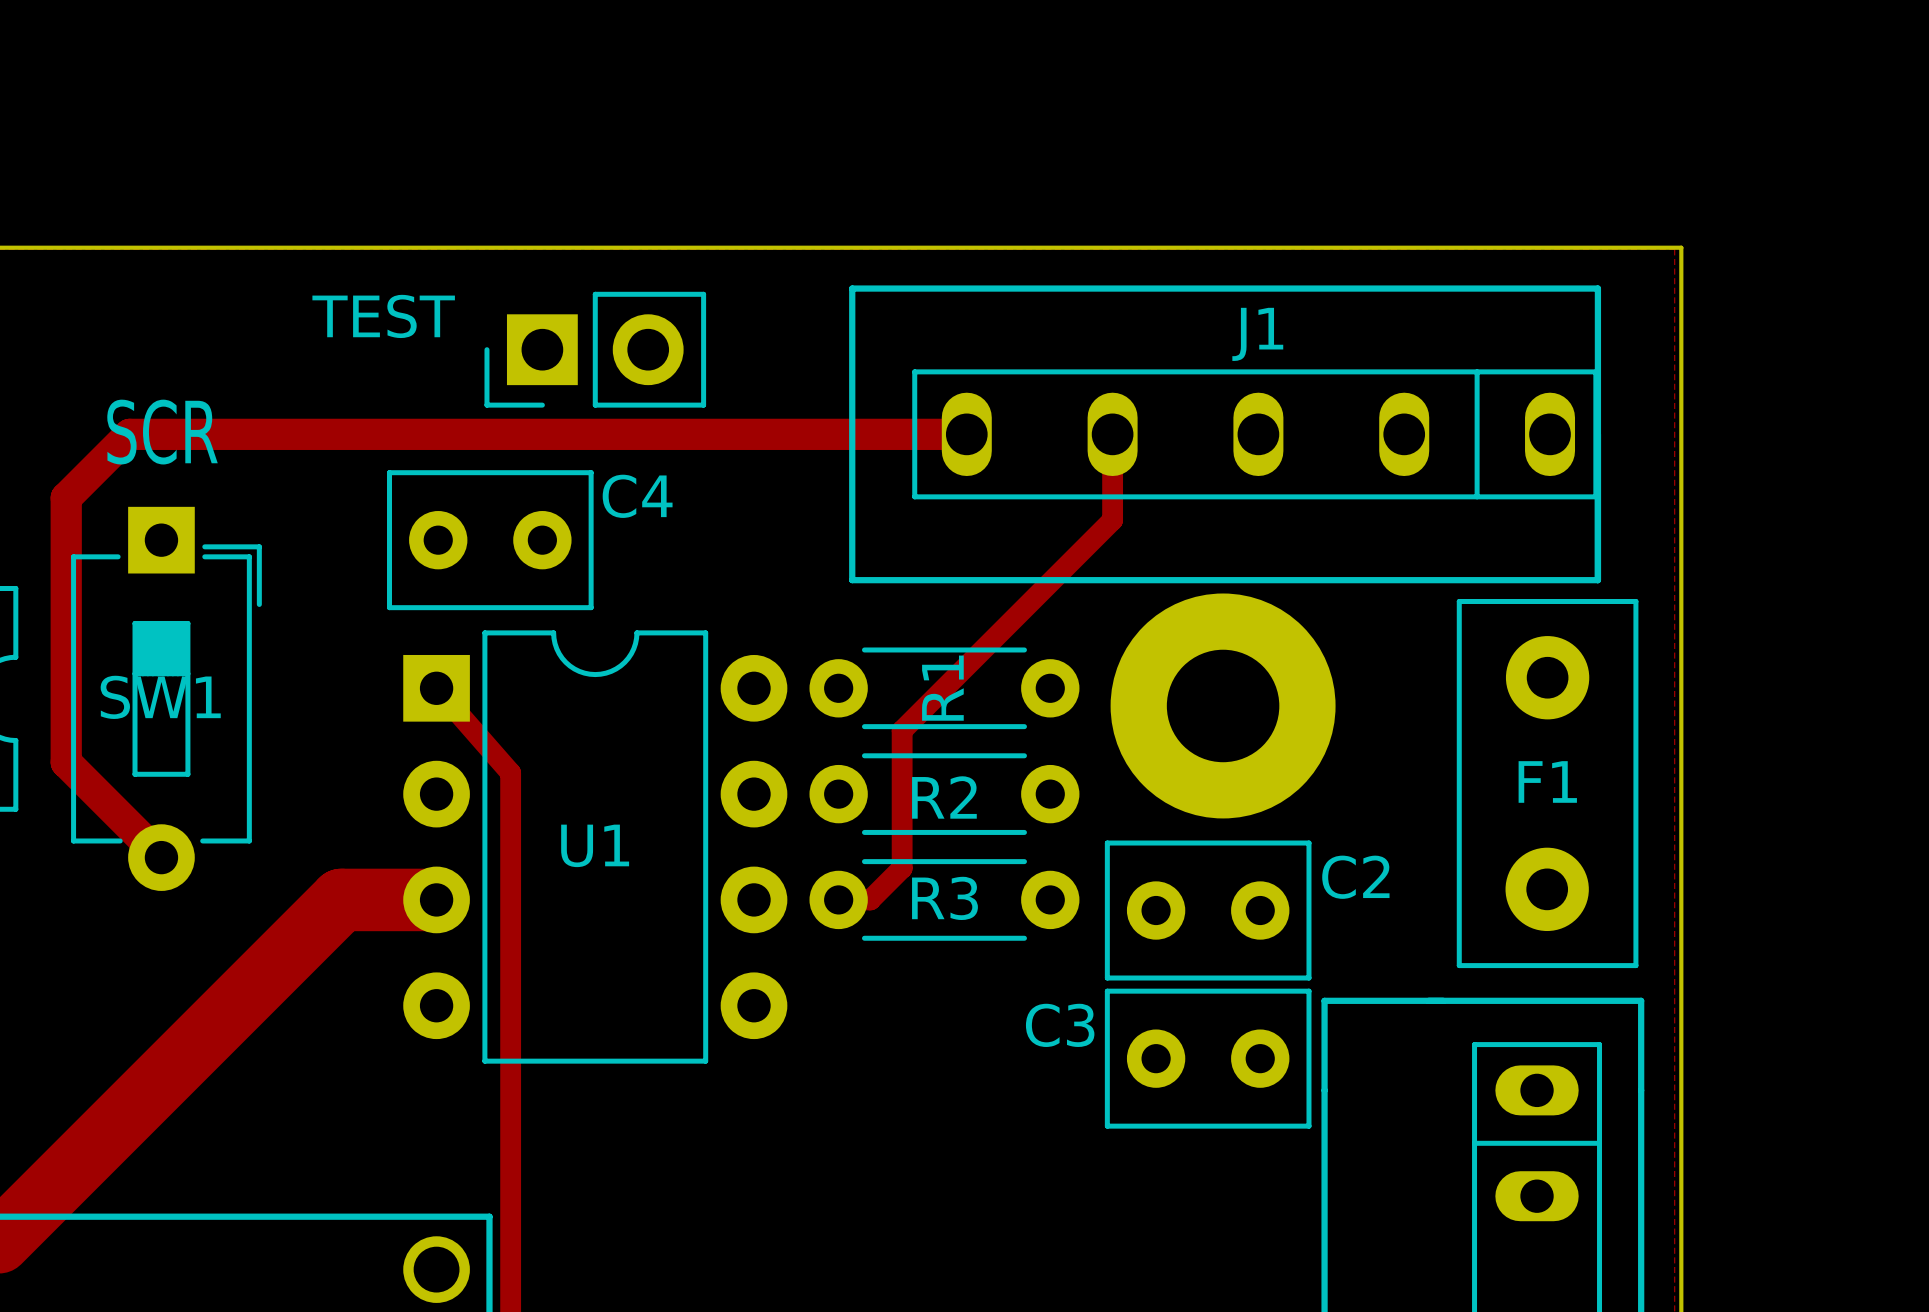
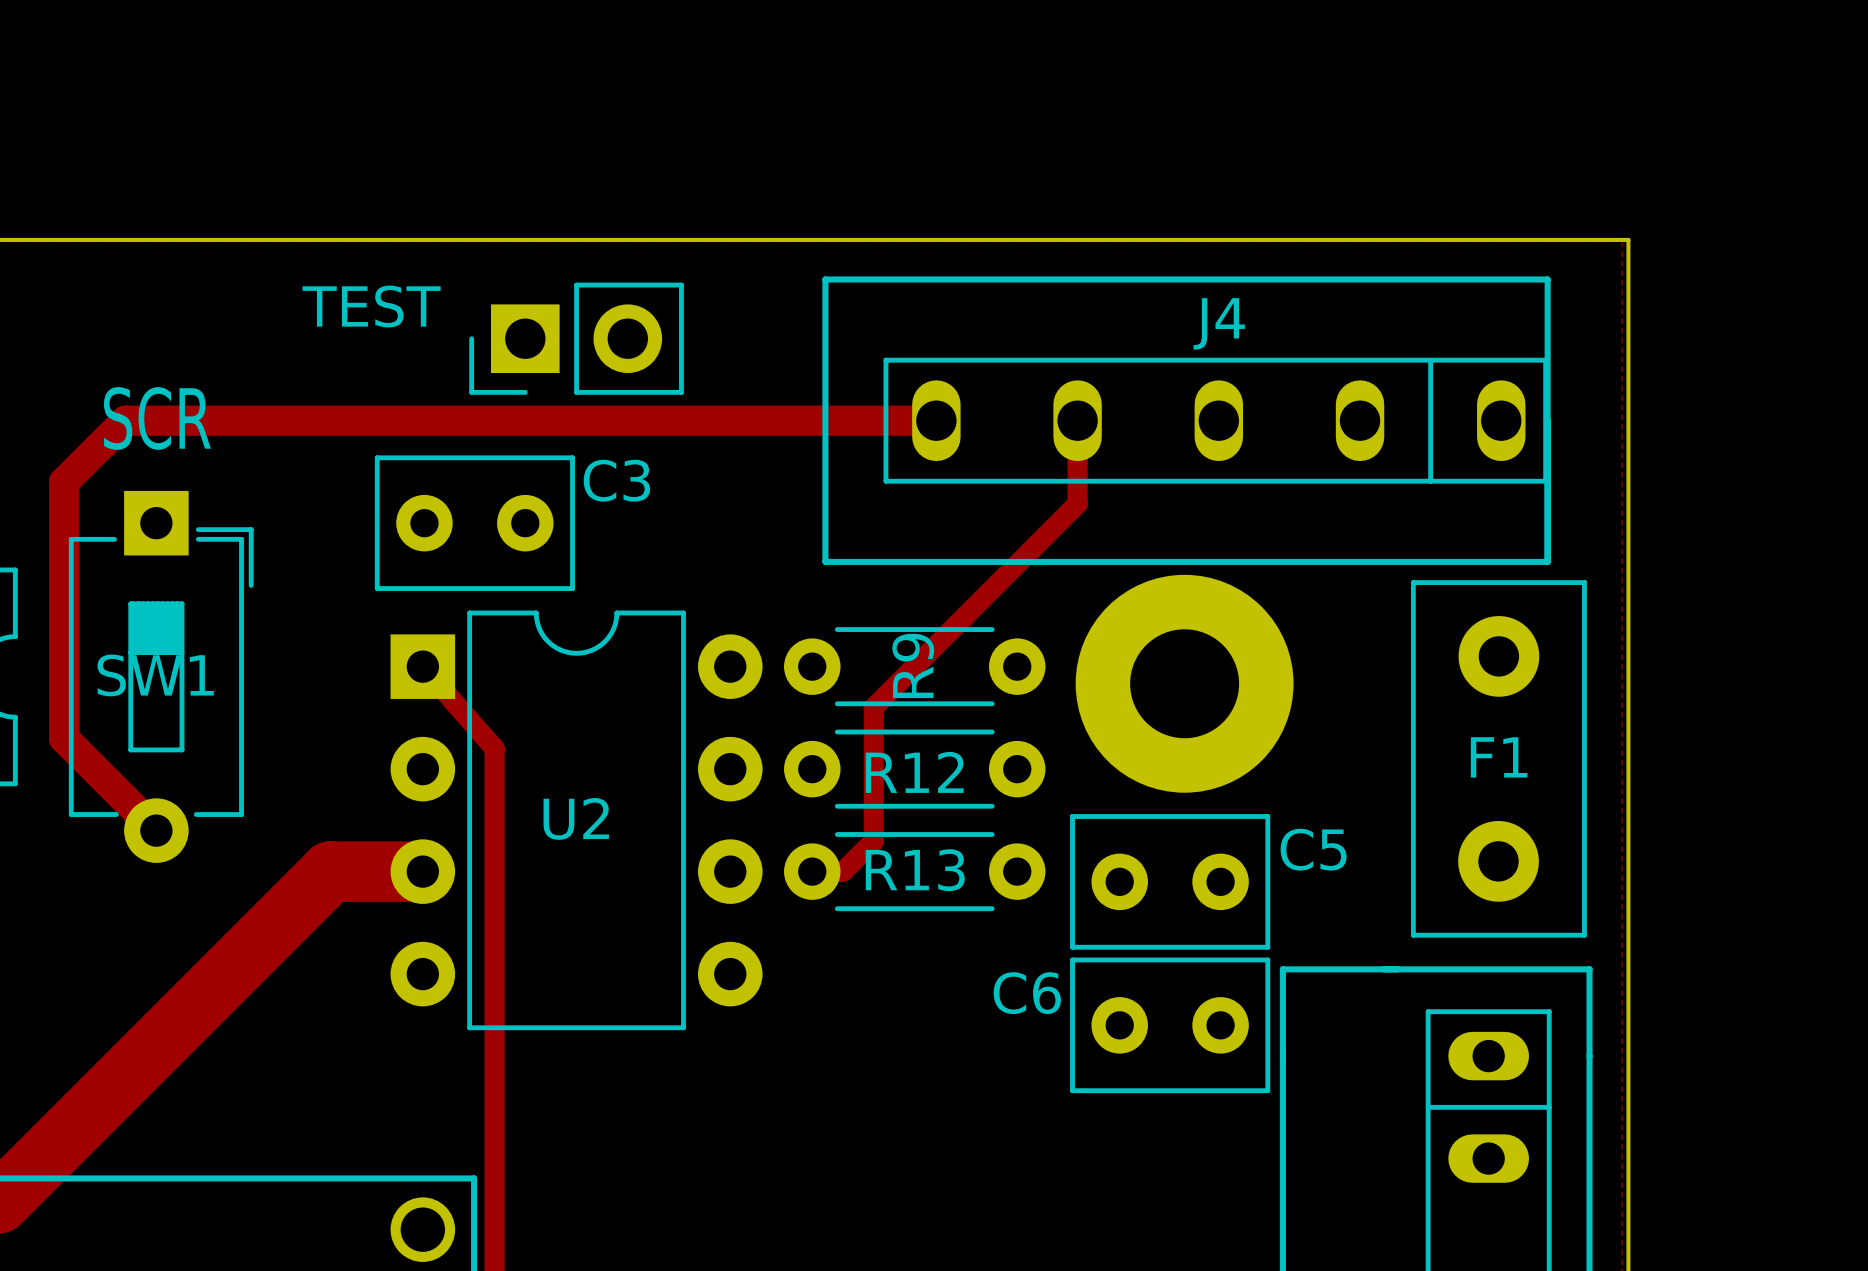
J1 name: J1 (1257, 334) -> J4 (1219, 323)
C4 name: C4 (637, 496) -> C3 (616, 480)
R1 name: R1 (942, 688) -> R9 (913, 665)
R2 name: R2 (944, 797) -> R12 (914, 772)
U1 name: U1 (595, 845) -> U2 (576, 818)
C2 name: C2 (1355, 877) -> C5 (1313, 849)
R3 name: R3 (944, 898) -> R13 (915, 870)
C3 name: C3 (1060, 1025) -> C6 (1027, 993)

